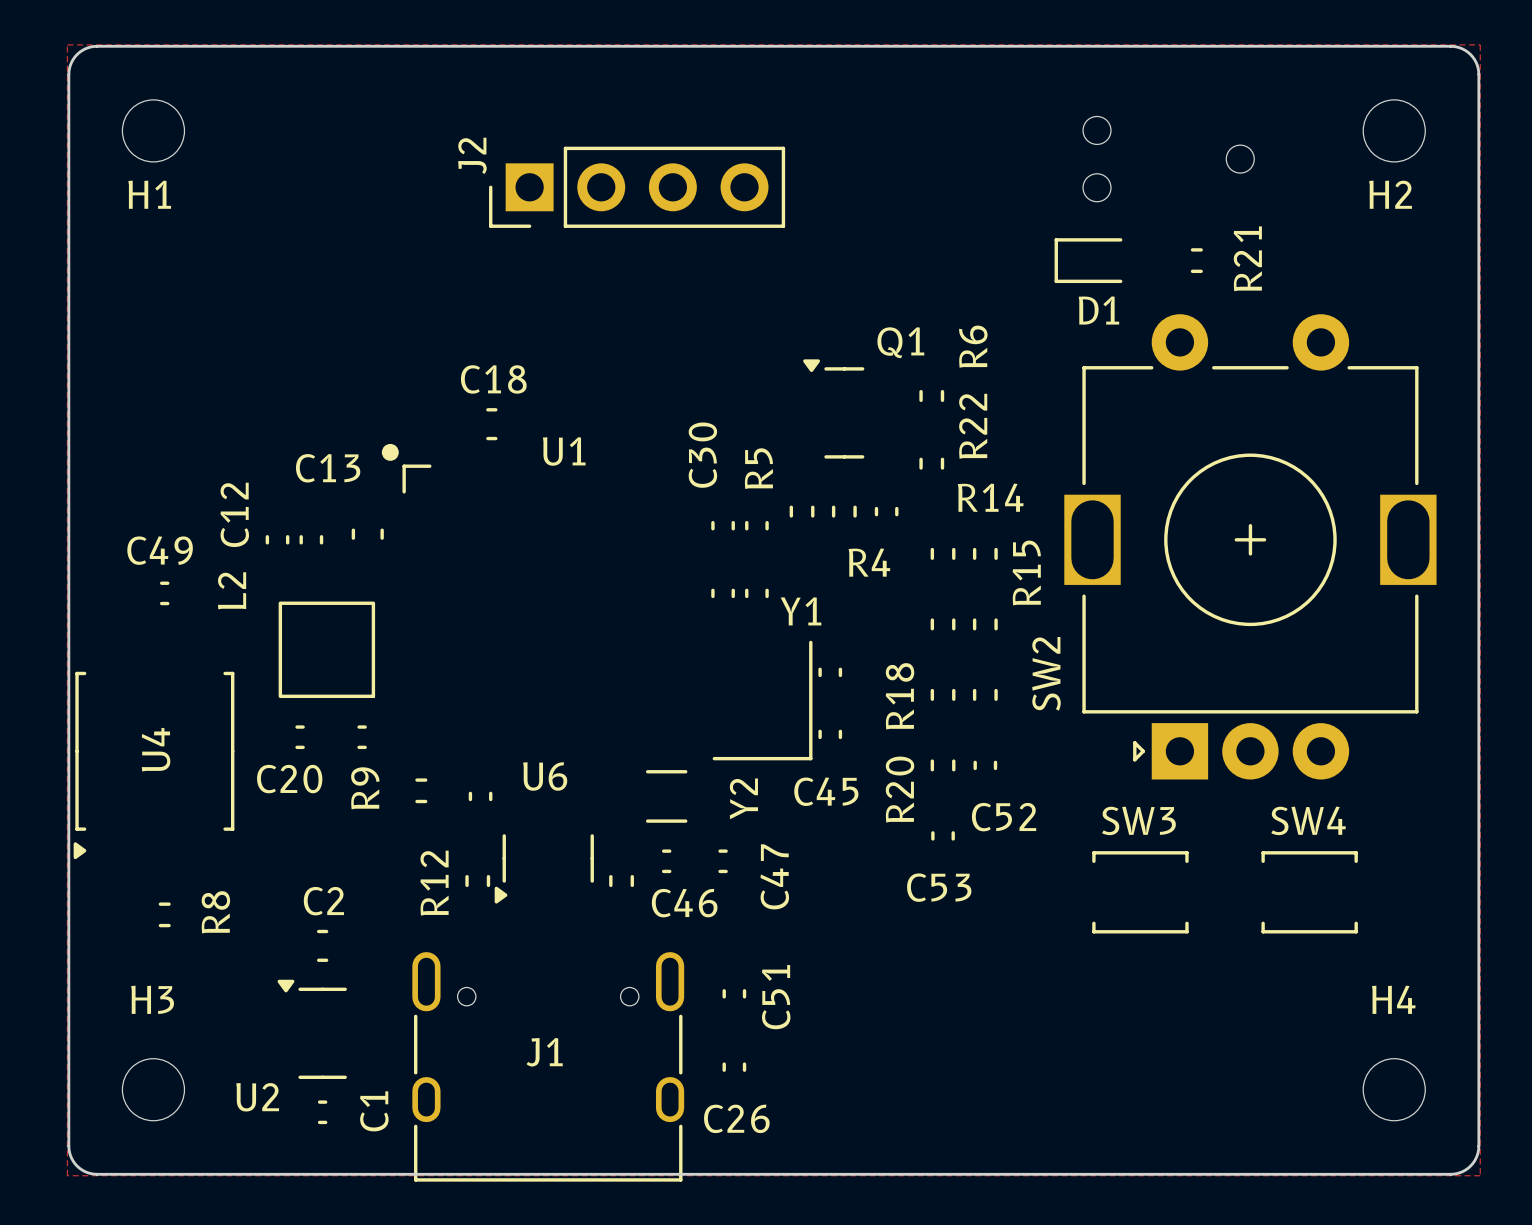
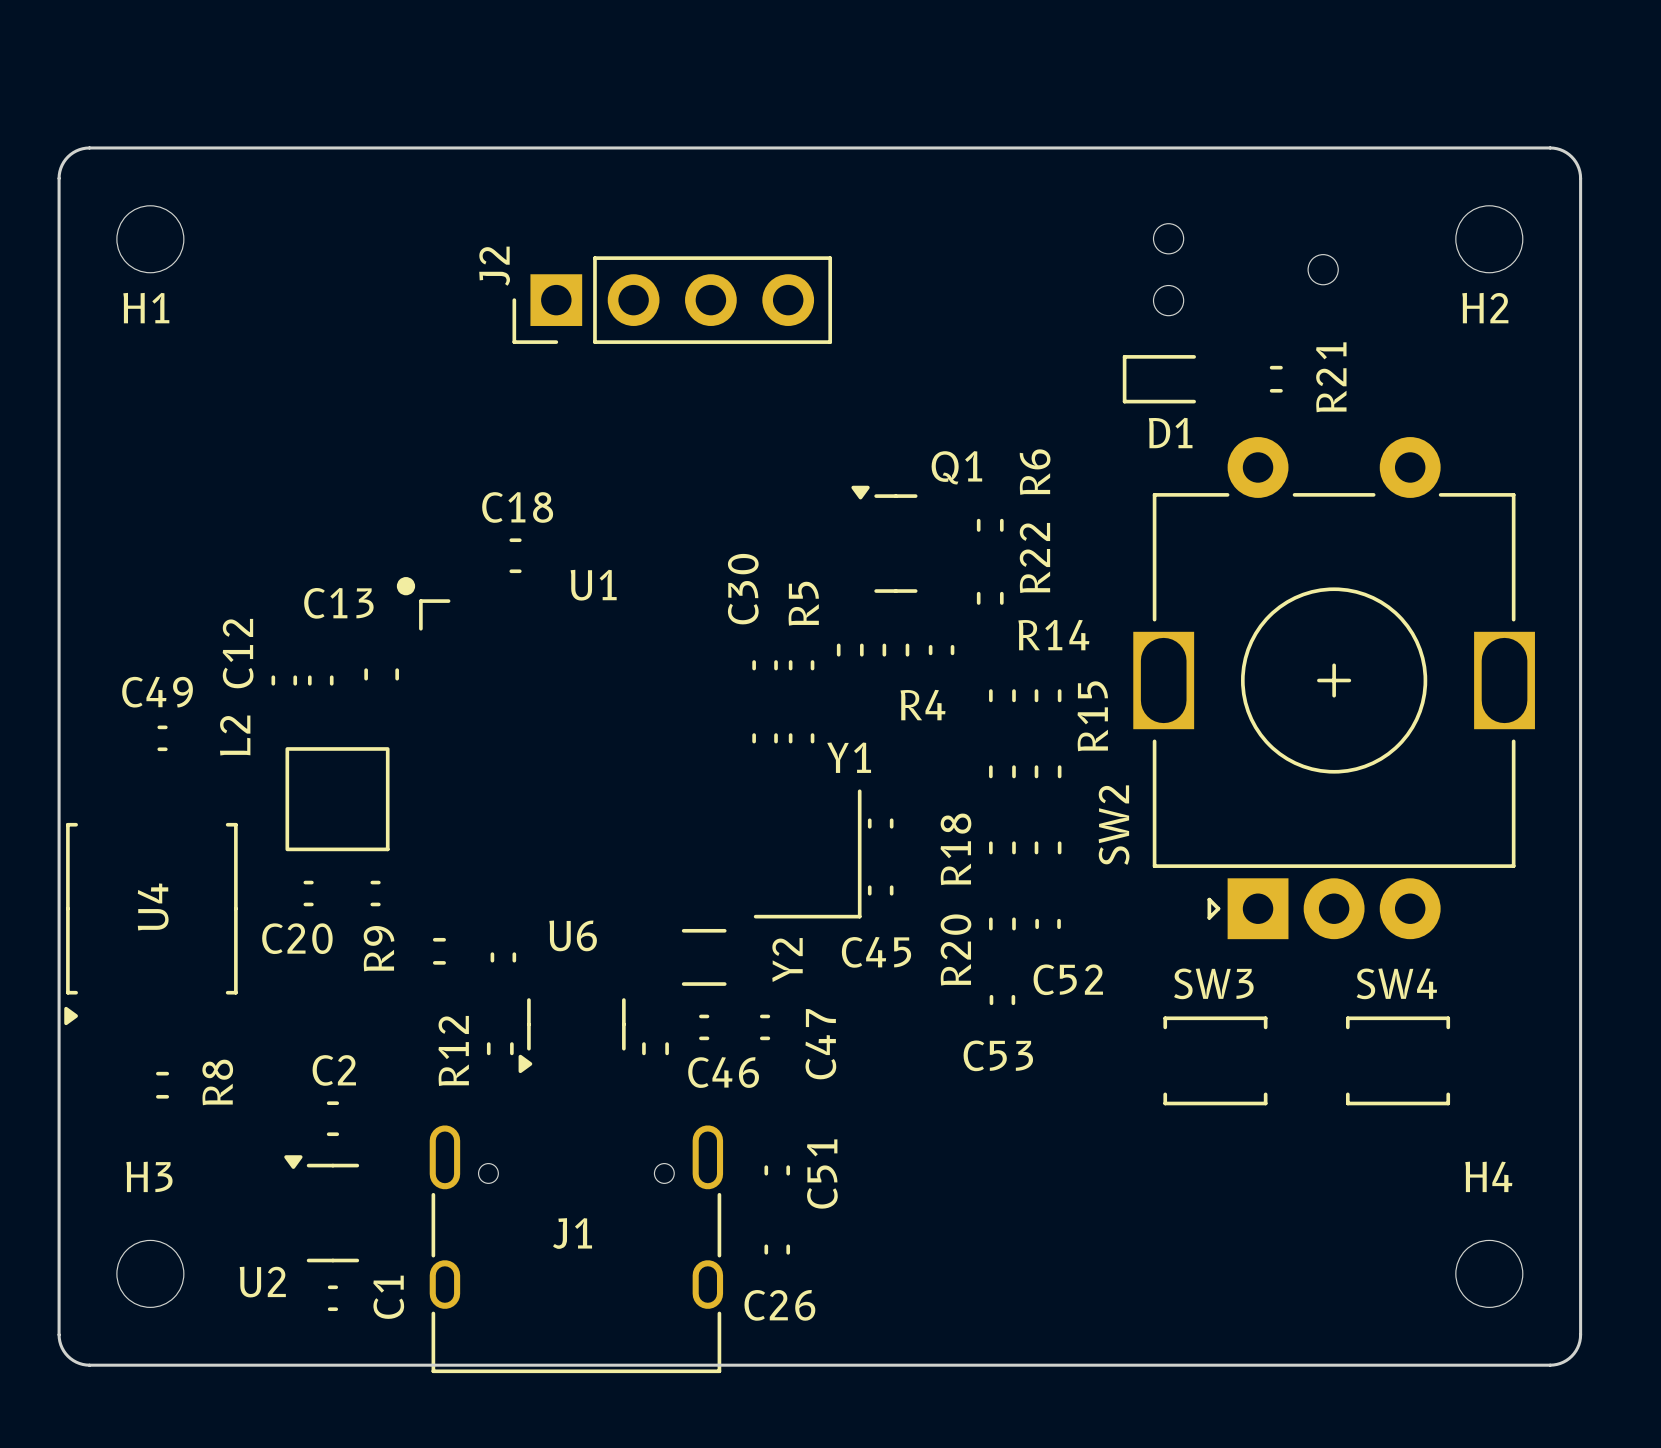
zone outline: (67, 44) (1480, 44) (1480, 1175) (67, 1175) (67, 44) -> none

